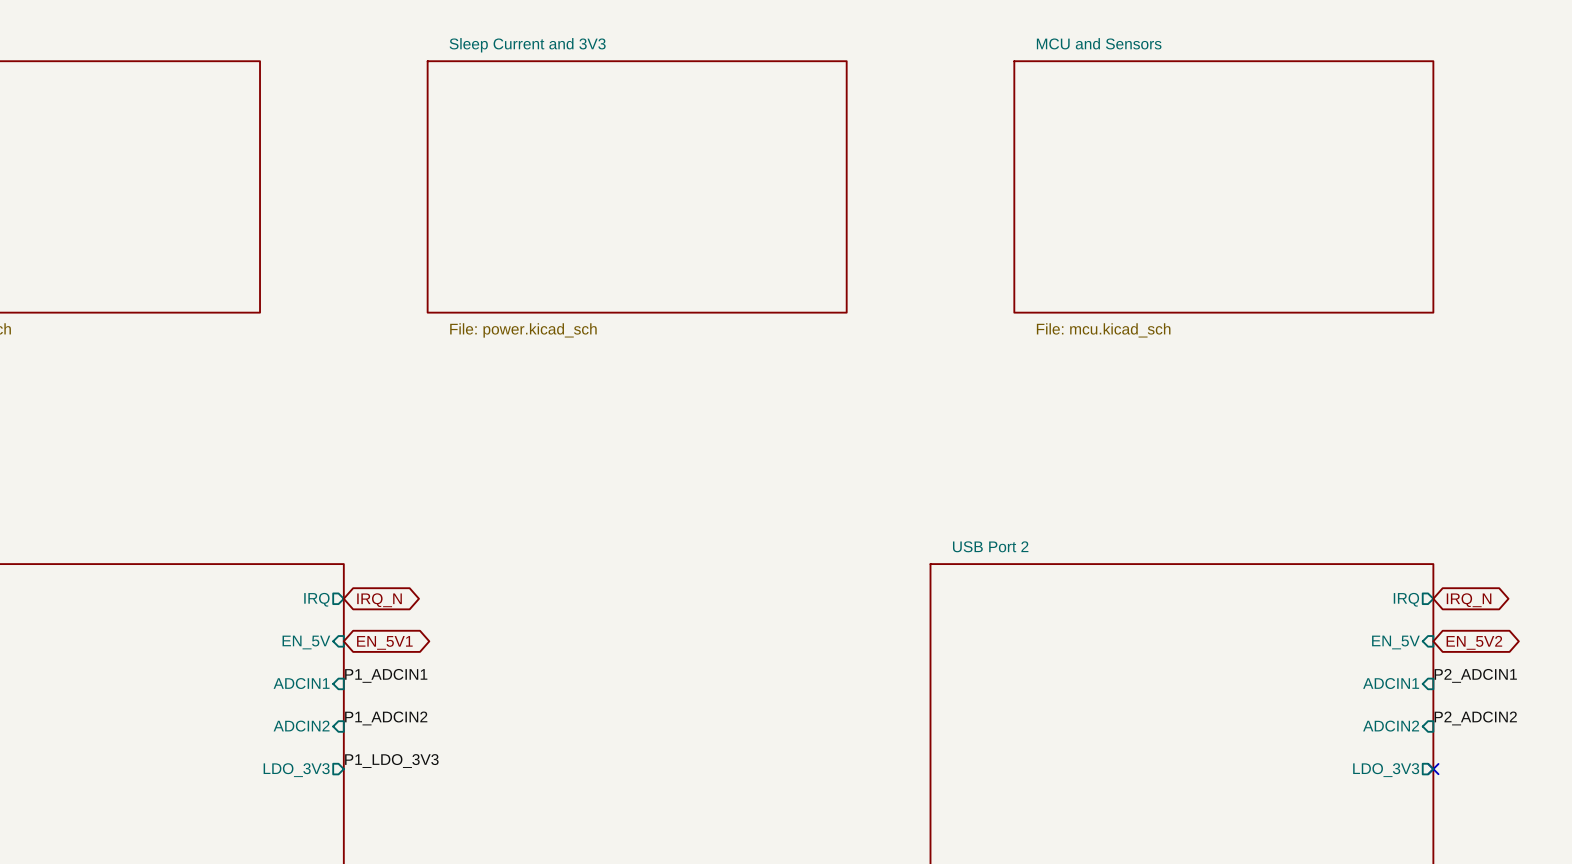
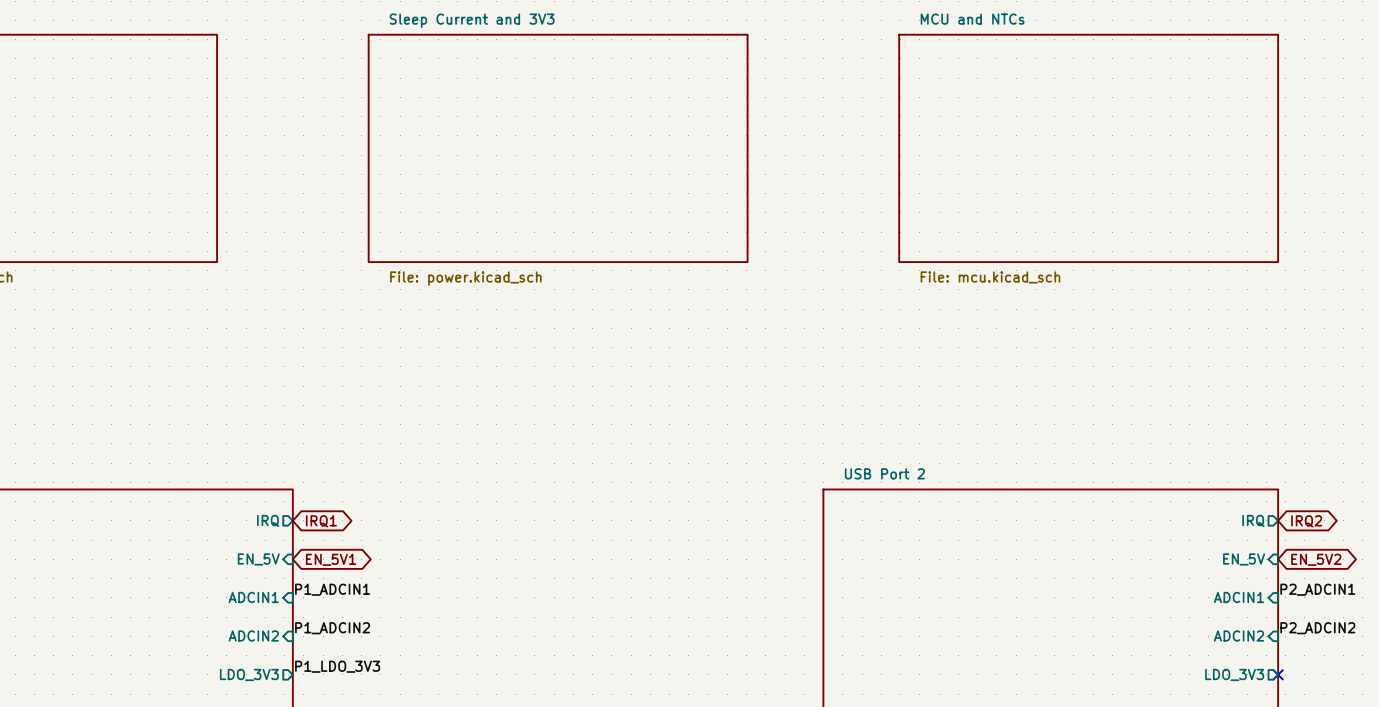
sheet MCU and Sensors name: MCU and Sensors (1099, 43) -> MCU and NTCs (972, 19)
global label: IRQ_N (379, 600) -> IRQ1 (321, 521)
global label: IRQ_N (1469, 600) -> IRQ2 (1306, 521)

